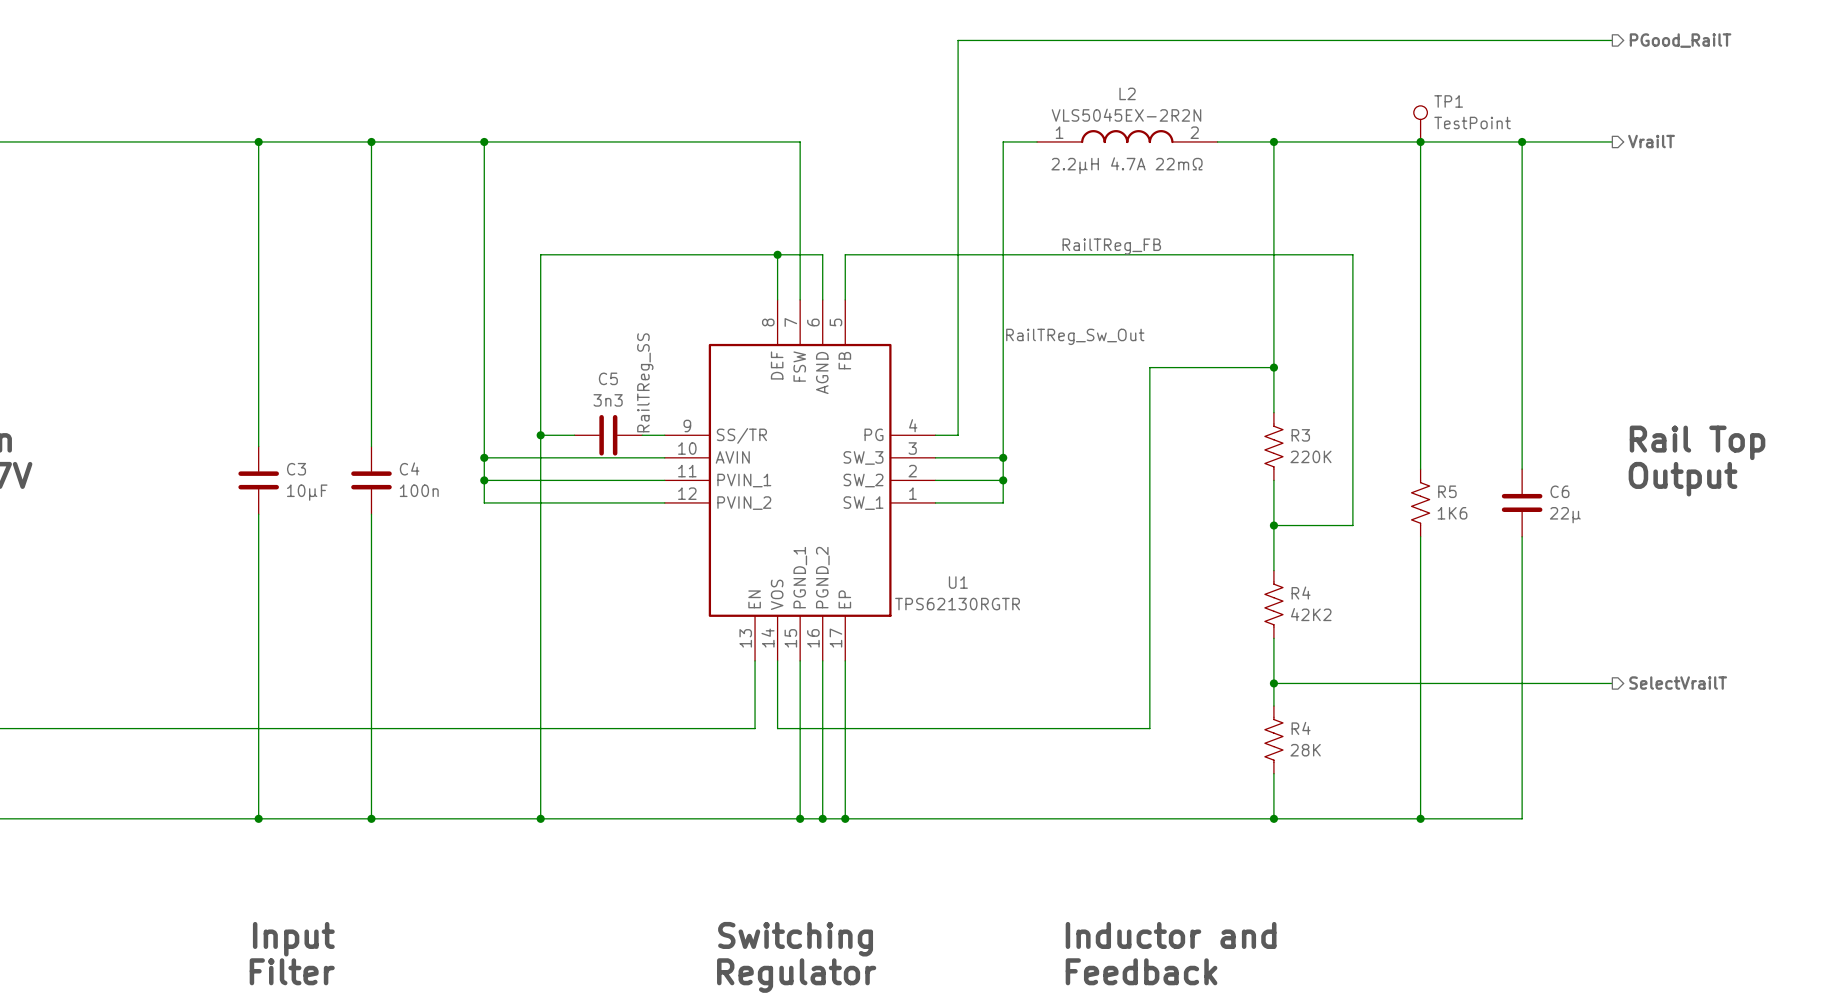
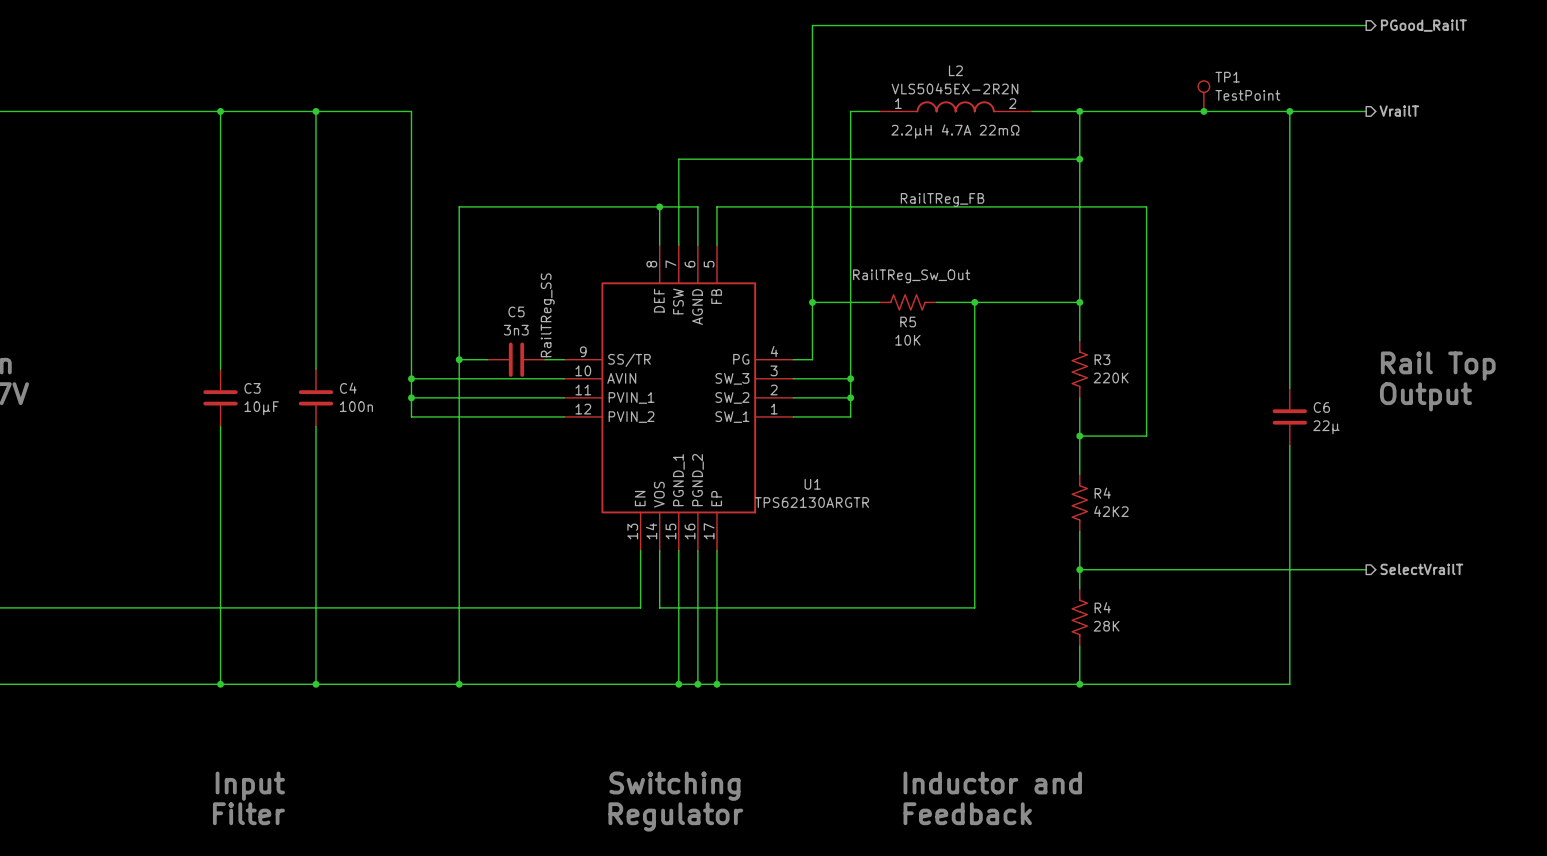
wire: (484, 141) (800, 141) (800, 198) -> (1079, 159) (678, 159)
junction: (484, 141) -> none
wire: (1420, 141) (1420, 469) -> none
junction: none -> (1079, 159)
wire: none -> (812, 302) (879, 302)
junction: none -> (812, 302)
wire: none -> (936, 302) (974, 302)
junction: none -> (974, 302)
R5 rotation: 0° (1420, 502) -> 90° clockwise (907, 302)
R5 position: (1420, 502) -> (907, 302)
R5 value: 1K6 (1452, 513) -> 10K (907, 340)
wire: (1420, 536) (1420, 818) -> none
U1 value: TPS62130RGTR (957, 604) -> TPS62130ARGTR (812, 502)
junction: (1420, 818) -> none

